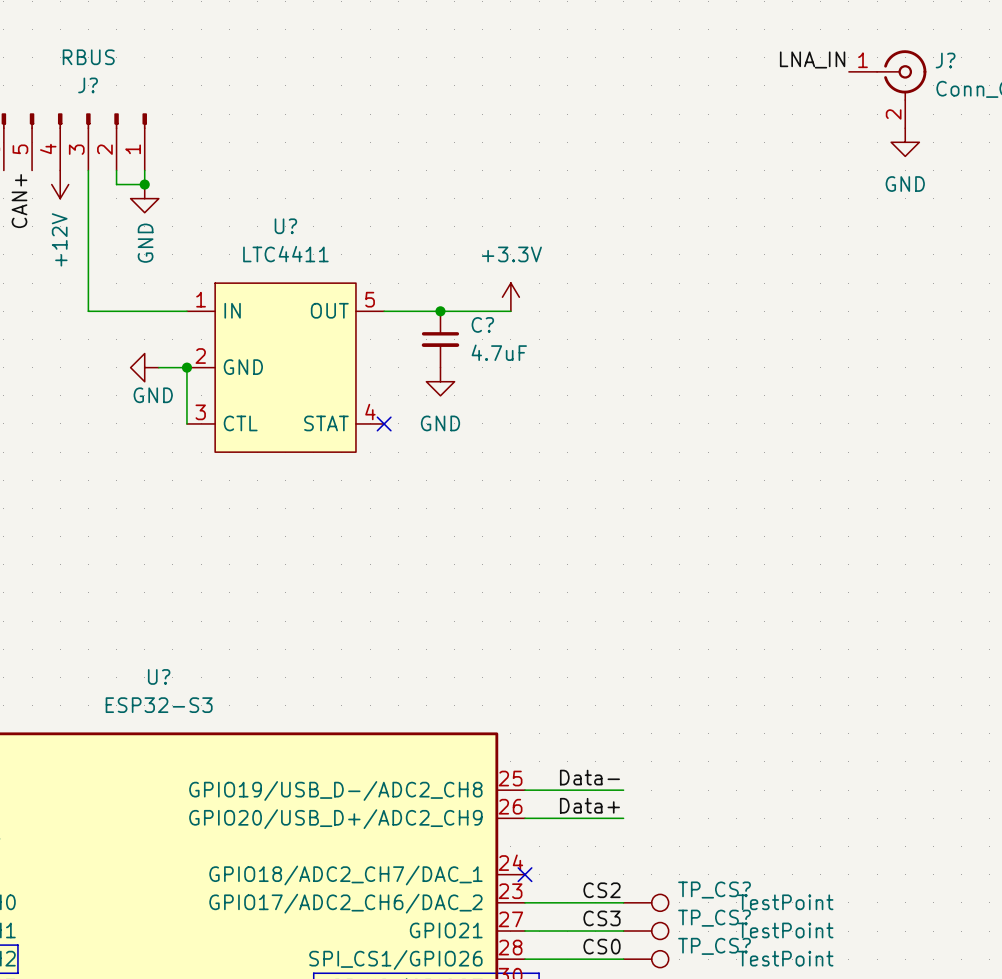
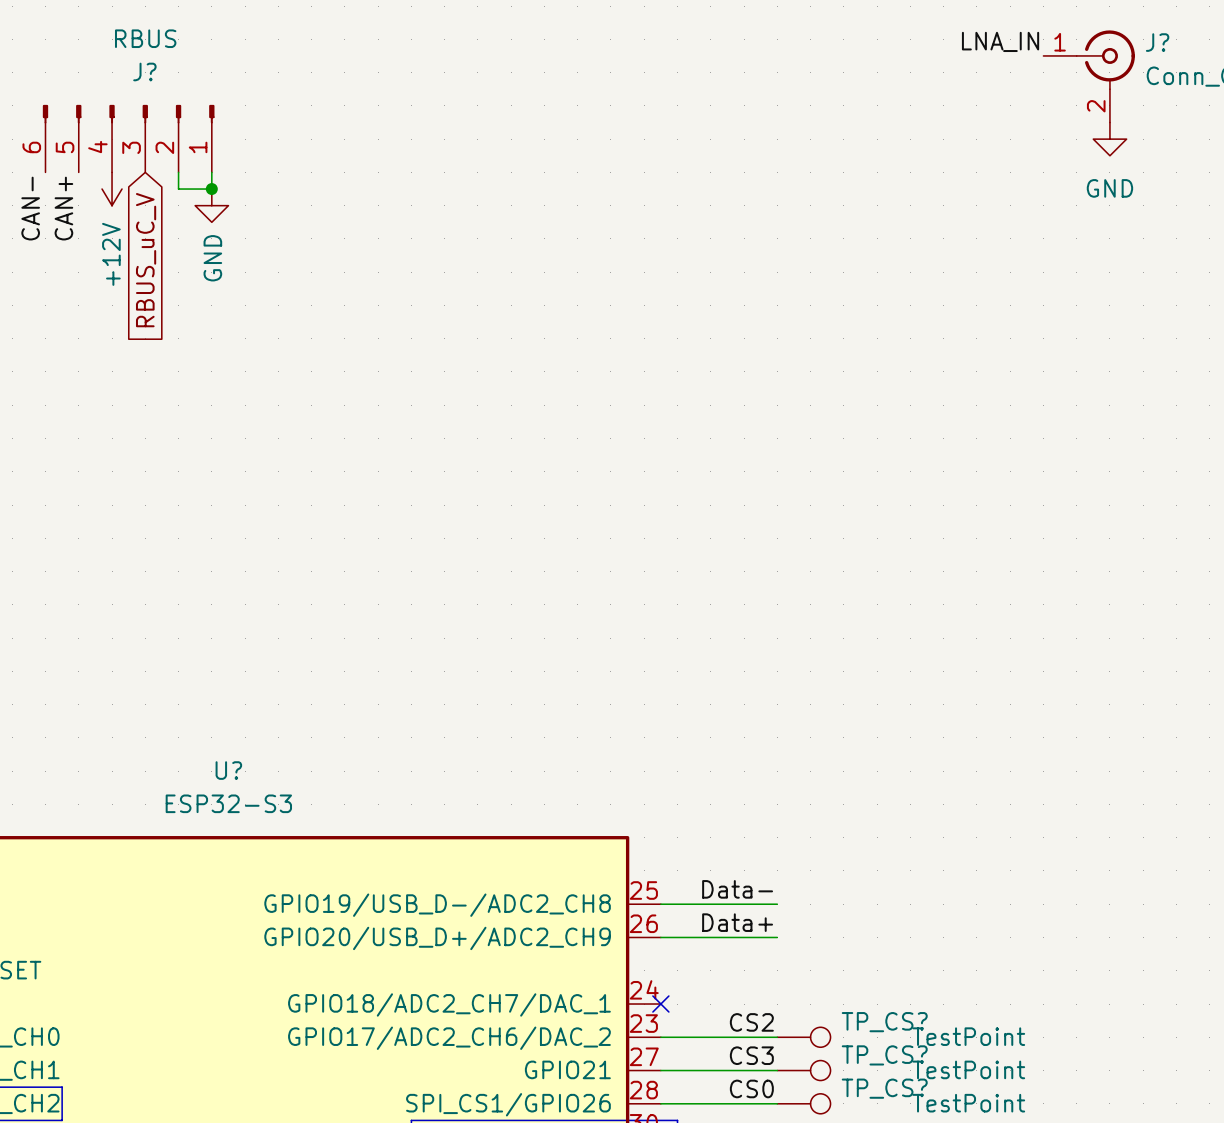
wire: (88, 170) (88, 311) (186, 311) -> none
global label: none -> RBUS_uC_V (146, 260)
power symbol: +3.3V (510, 297) -> none
wire: (384, 311) (510, 311) -> none
junction: (440, 311) -> none
C?: 4.7uF (440, 339) -> none
power symbol: GND (144, 367) -> none
wire: (158, 367) (186, 367) (186, 423) -> none
junction: (186, 367) -> none
U?: LTC4411 (285, 367) -> none
power symbol: GND (440, 381) -> none
no-connect mark: (384, 423) -> none

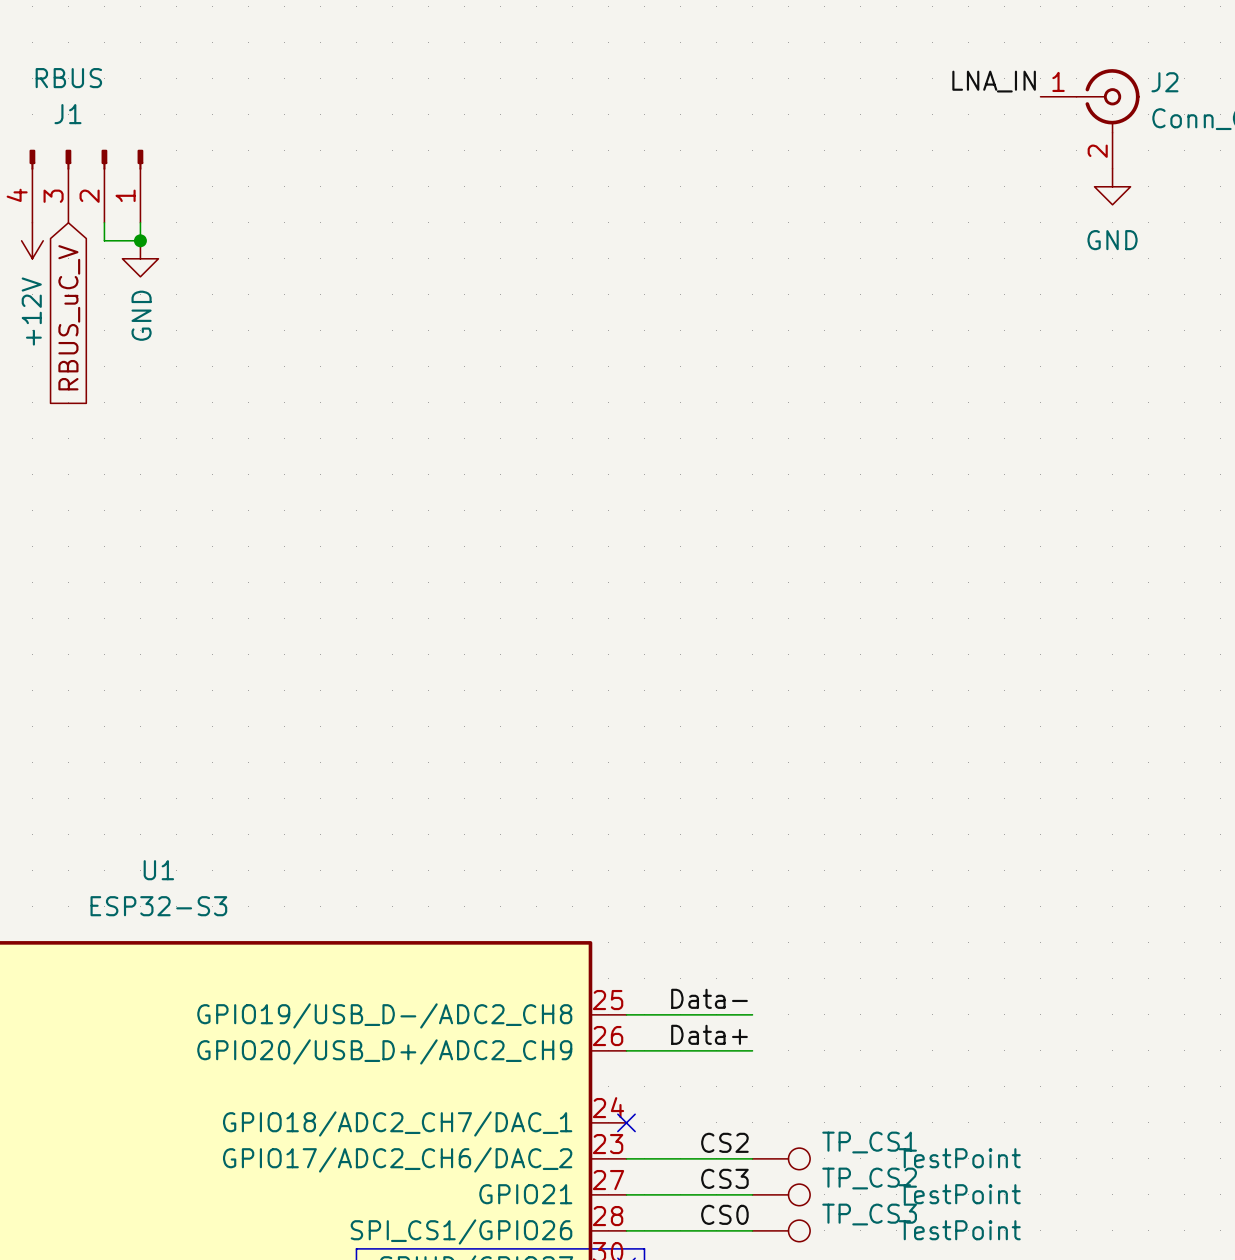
J? name: J? (1157, 42) -> J2 (1164, 82)
J? name: J? (144, 71) -> J1 (68, 114)
U? name: U? (228, 770) -> U1 (158, 870)
TP_CS? name: TP_CS? (884, 1022) -> TP_CS1 (869, 1142)
TP_CS? name: TP_CS? (884, 1055) -> TP_CS2 (869, 1178)
TP_CS? name: TP_CS? (884, 1088) -> TP_CS3 (869, 1214)

